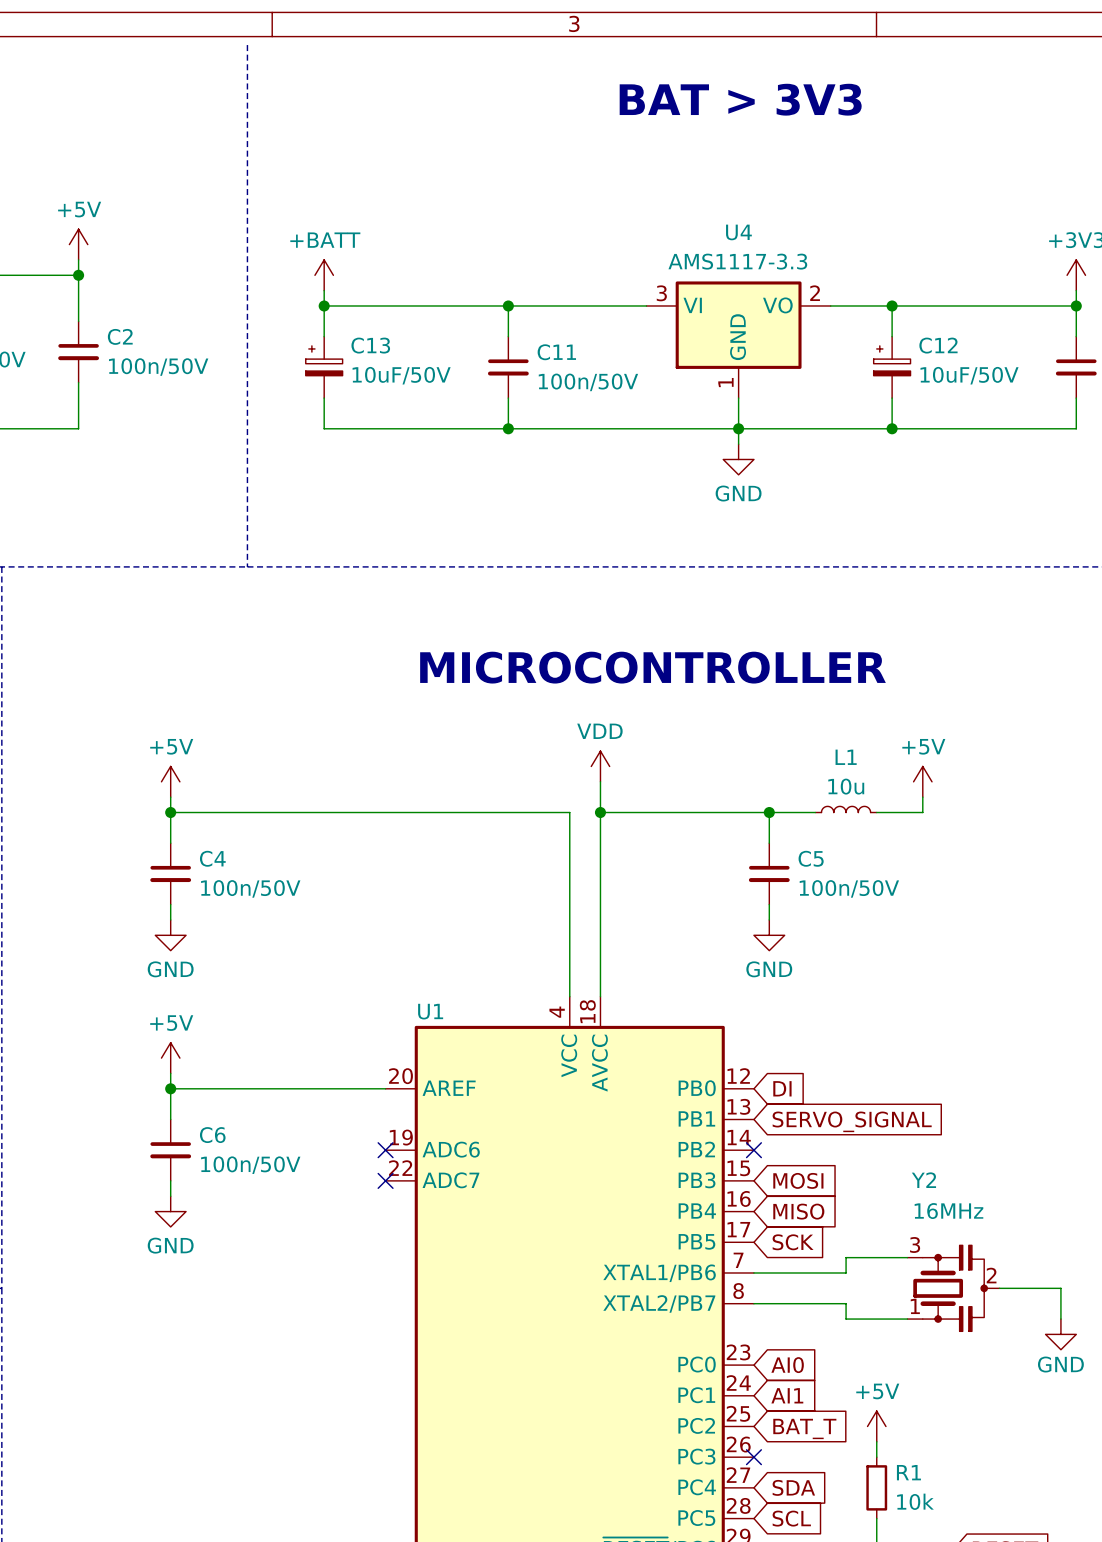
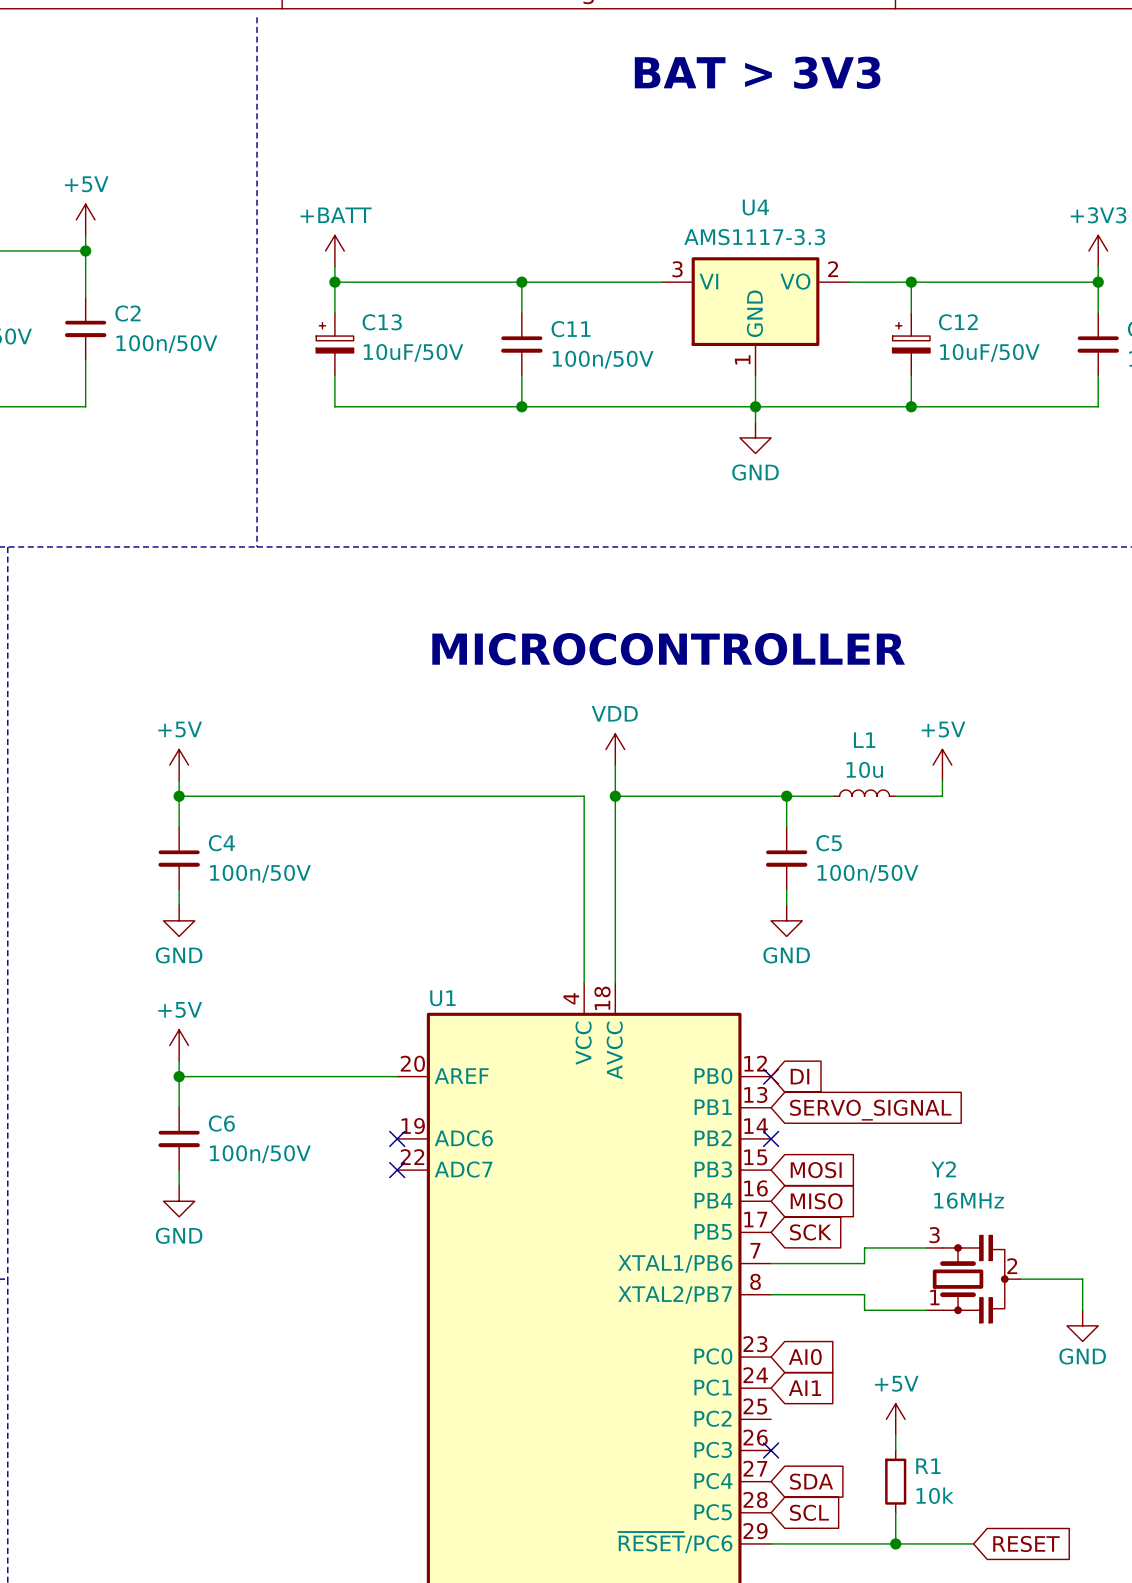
no-connect mark: none -> (771, 1076)
global label: BAT_T (804, 1428) -> none

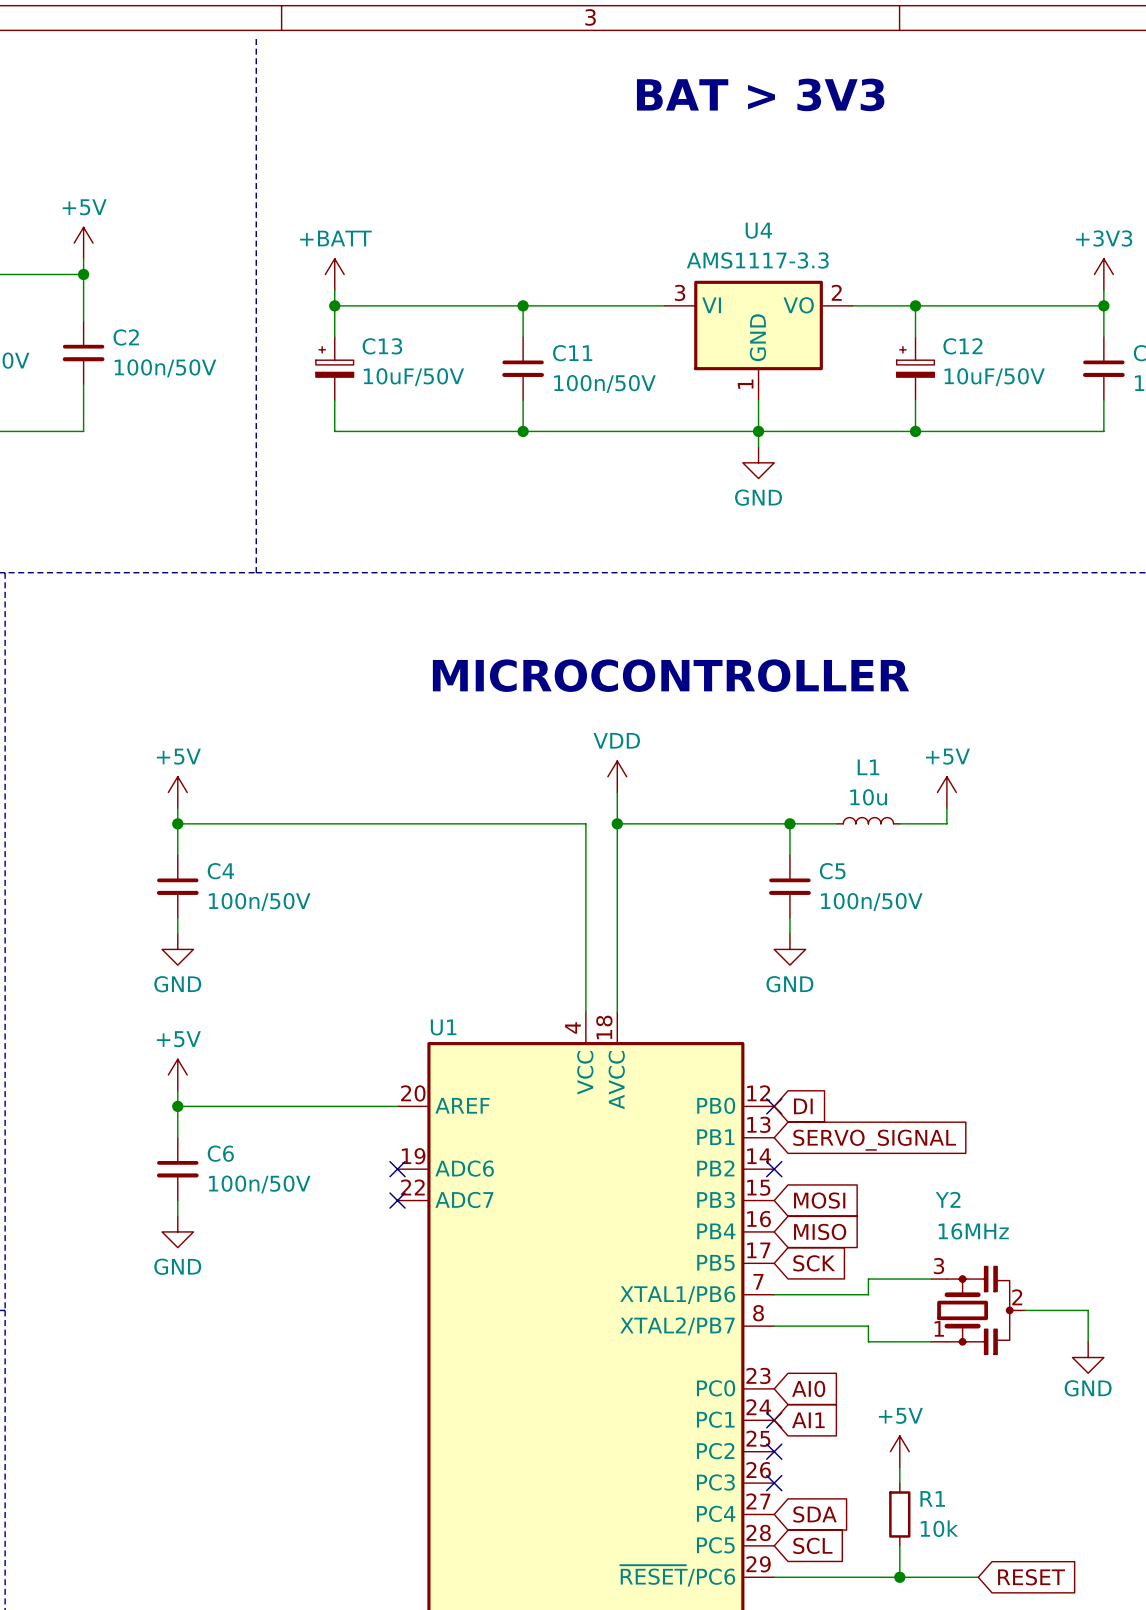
no-connect mark: none -> (774, 1420)
no-connect mark: none -> (774, 1451)

